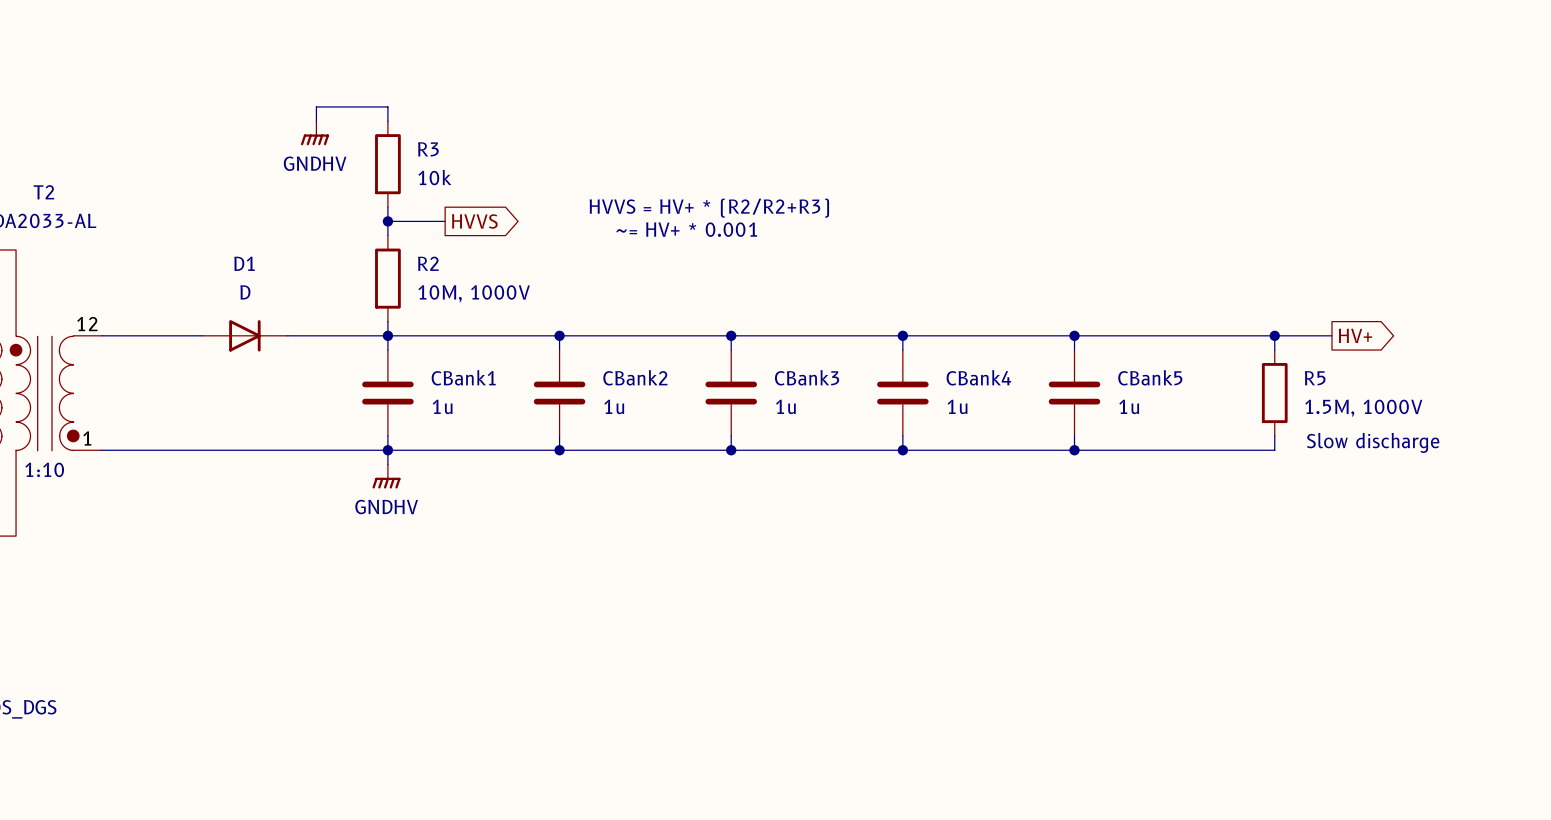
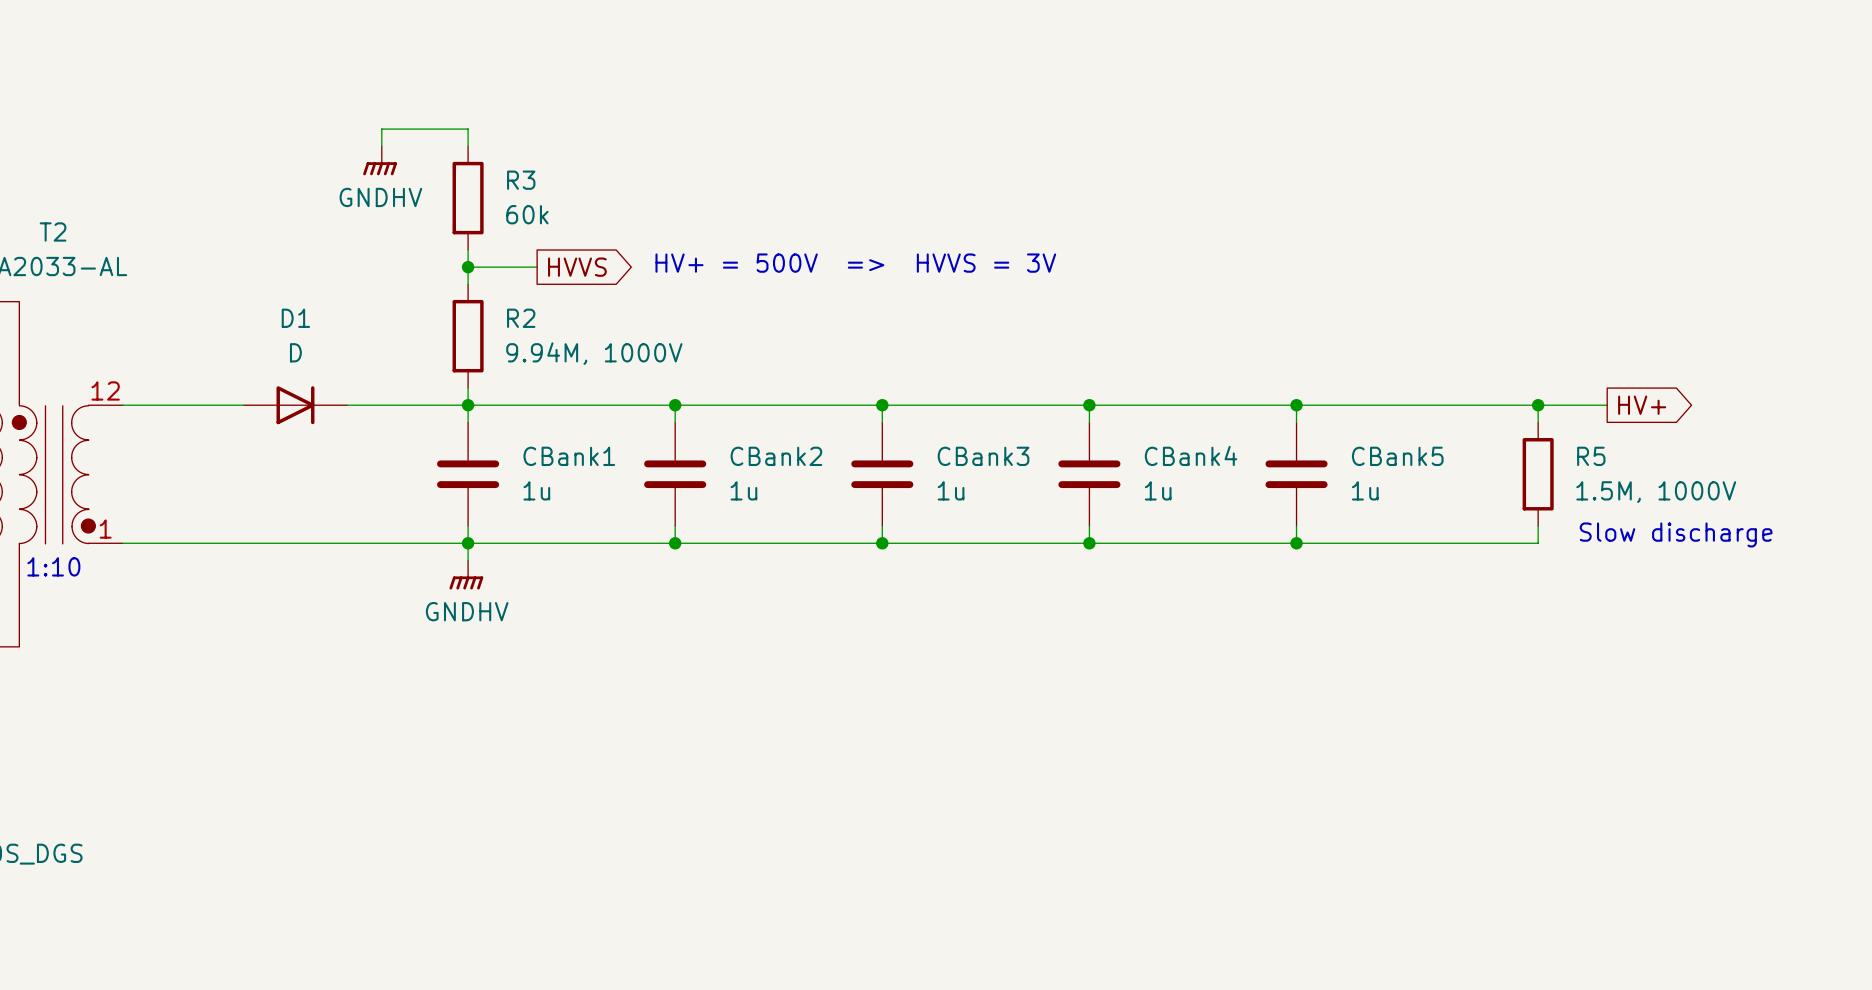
R3 value: 10k (434, 177) -> 60k (527, 214)
text: HVVS = HV+ * (R2/R2+R3) (709, 208) -> none
text: none -> HV+ = 500V => HVVS = 3V (855, 263)
text: ~= HV+ * 0.001 (686, 229) -> none
R2 value: 10M, 1000V (474, 293) -> 9.94M, 1000V (594, 353)

